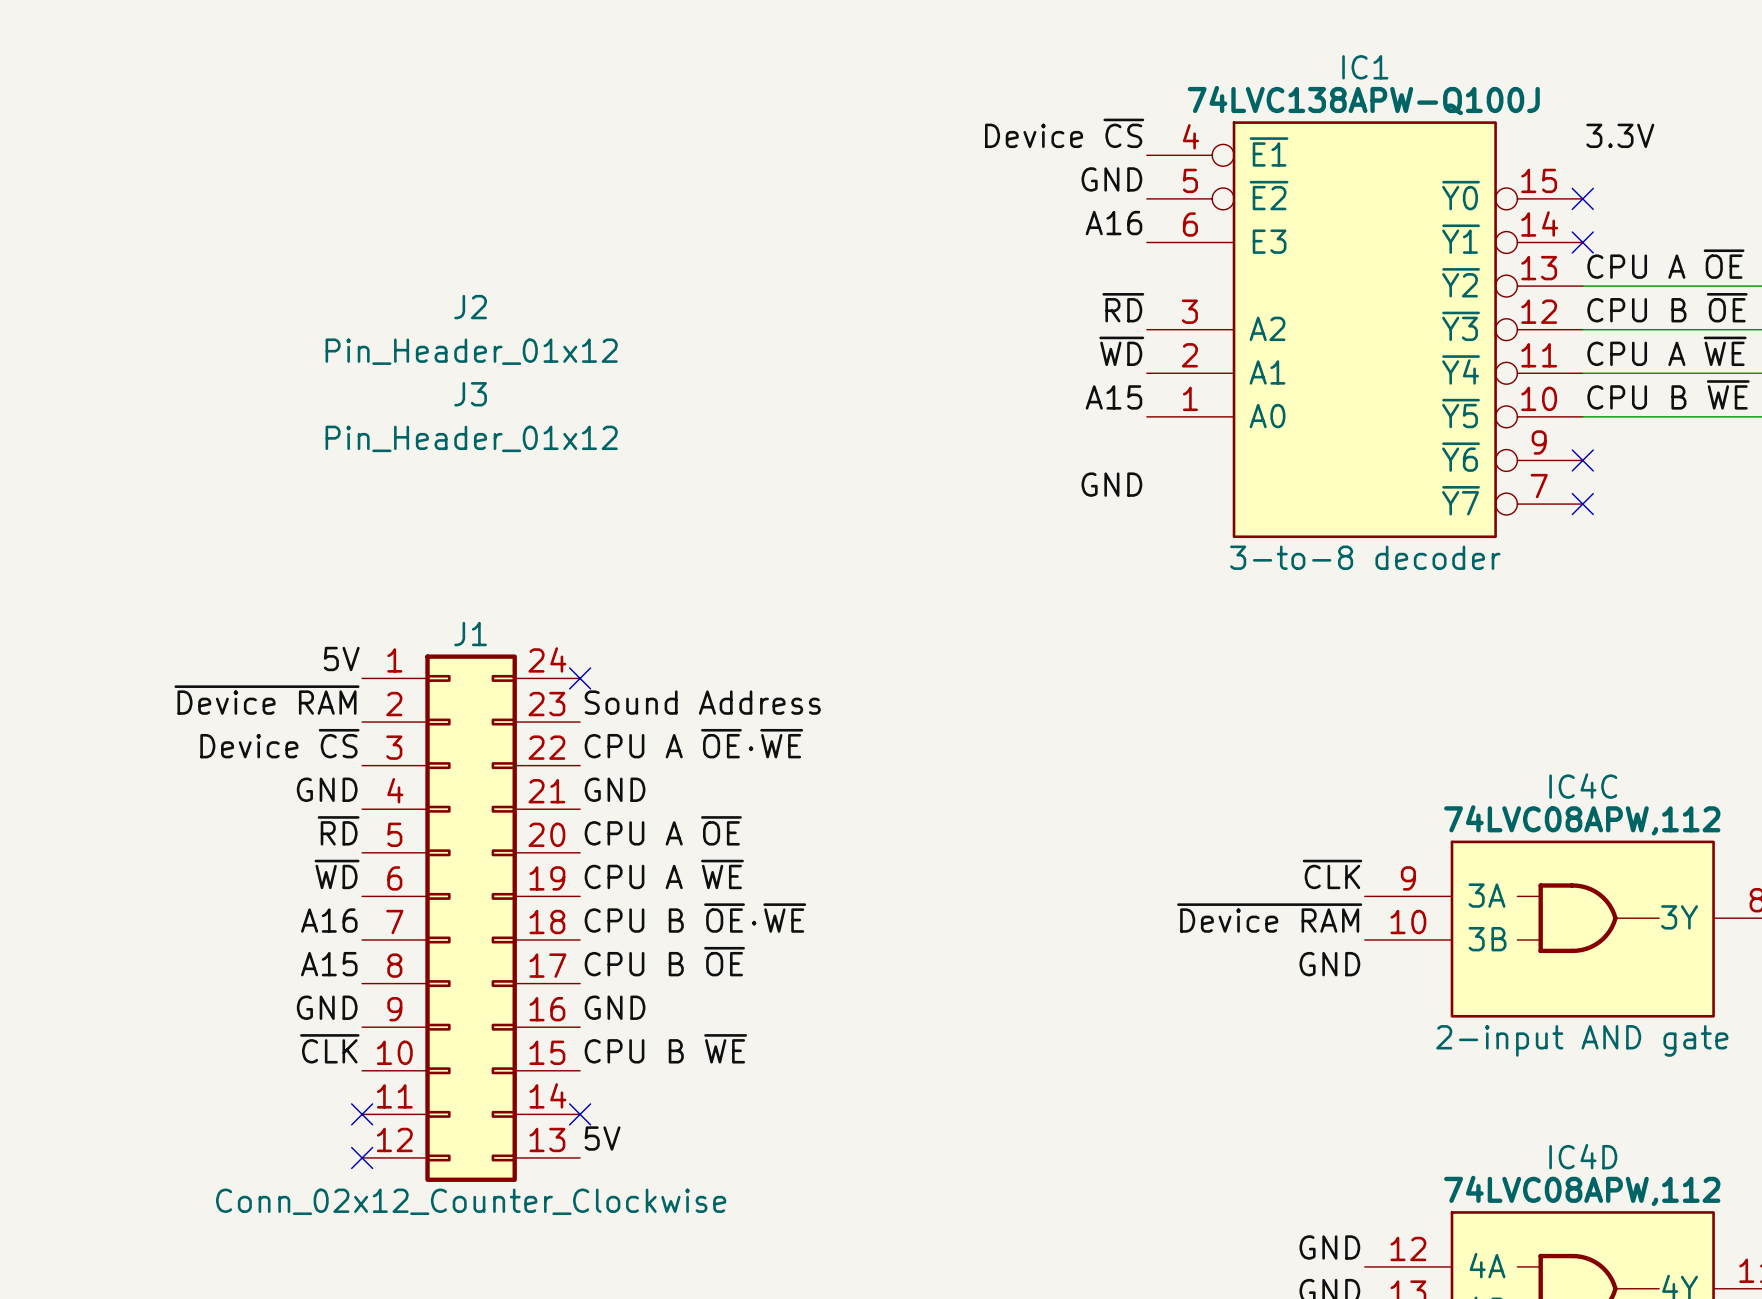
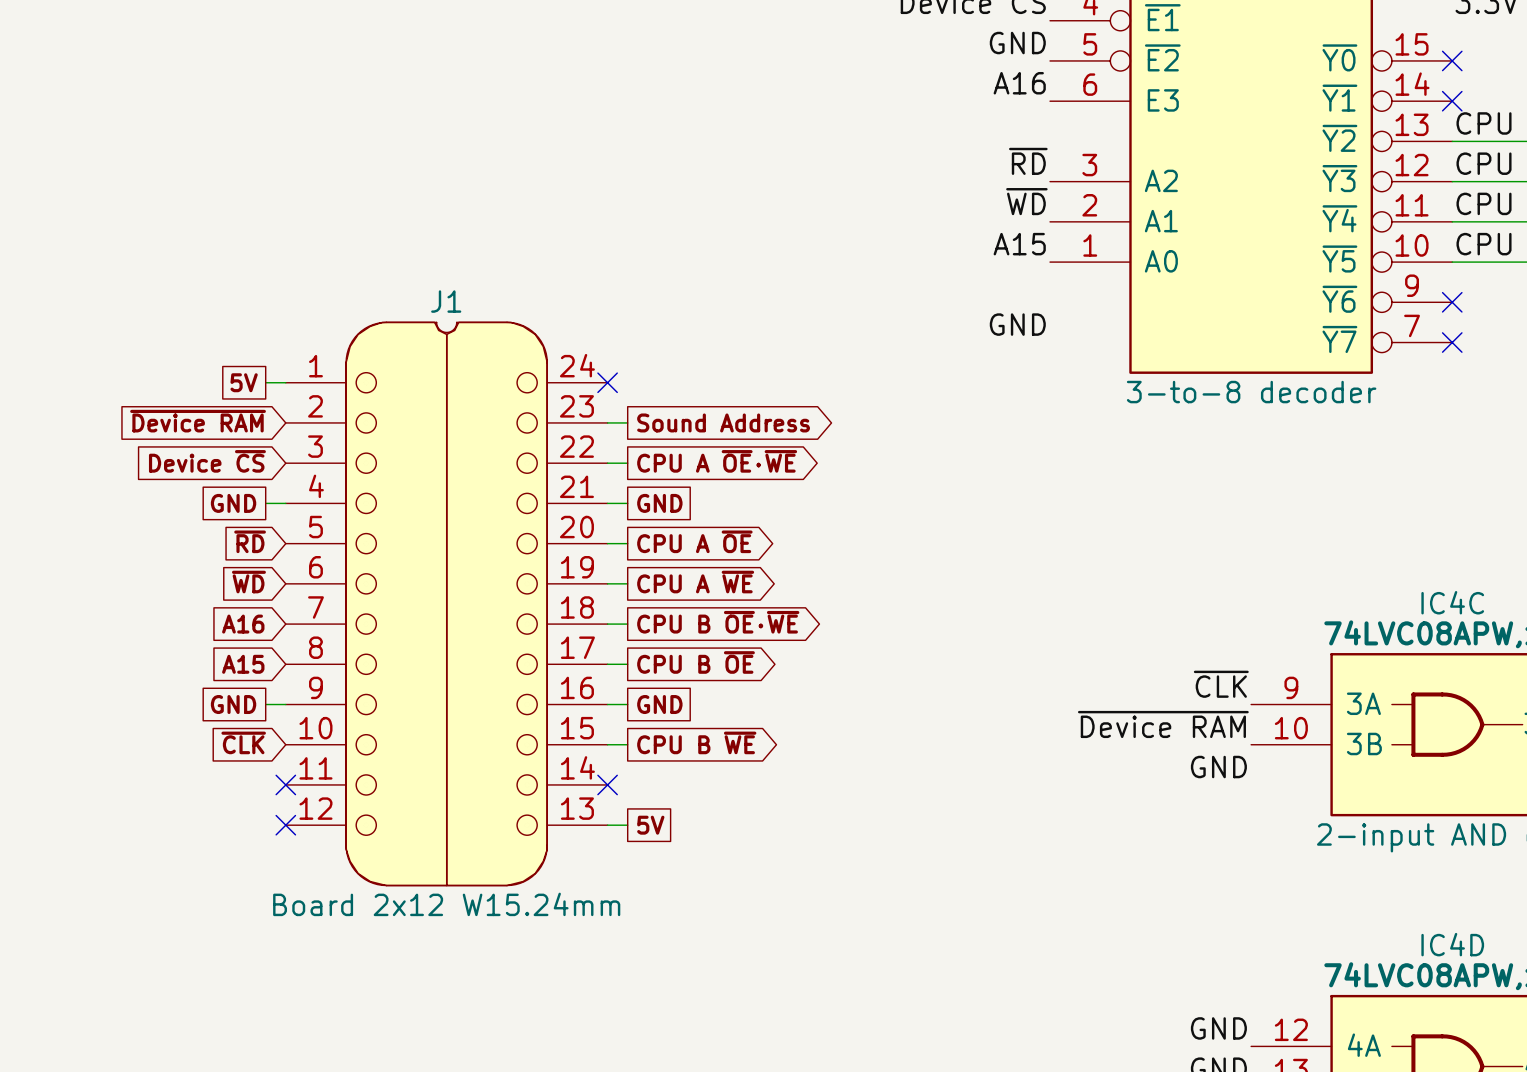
J2: Pin_Header_01x12 (471, 329) -> none
J3: Pin_Header_01x12 (471, 417) -> none
global label: none -> 5V (244, 382)
wire: none -> (265, 382) (285, 382)
no-connect mark: none -> (607, 382)
global label: none -> ~{Device RAM} (198, 421)
wire: none -> (607, 422) (627, 422)
global label: none -> Sound Address (723, 422)
global label: none -> Device ~{CS} (207, 461)
global label: none -> CPU A ~{OE}·~{WE} (717, 461)
J1 name position: J1 (470, 634) -> J1 (446, 301)
wire: none -> (607, 463) (627, 463)
J1 symbol: [362, 654, 581, 1182] -> [285, 322, 608, 886]
label: 5V (341, 658) -> none
global label: none -> GND (233, 503)
wire: none -> (265, 503) (285, 503)
no-connect mark: (580, 678) -> none
wire: none -> (607, 503) (627, 503)
global label: none -> GND (659, 503)
label: ~{Device RAM} (267, 700) -> none
label: Sound Address (702, 702) -> none
global label: none -> ~{RD} (250, 541)
global label: none -> CPU A ~{OE} (694, 541)
wire: none -> (607, 543) (627, 543)
label: Device ~{CS} (279, 743) -> none
label: CPU A ~{OE}·~{WE} (693, 743) -> none
global label: none -> ~{WD} (248, 582)
global label: none -> CPU A ~{WE} (695, 582)
wire: none -> (607, 583) (627, 583)
label: GND (327, 789) -> none
label: GND (615, 789) -> none
global label: none -> CPU B ~{OE}·~{WE} (718, 622)
global label: none -> A16 (243, 624)
wire: none -> (607, 624) (627, 624)
label: ~{RD} (338, 830) -> none
label: CPU A ~{OE} (663, 830) -> none
global label: none -> CPU B ~{OE} (696, 662)
global label: none -> A15 (243, 664)
wire: none -> (607, 664) (627, 664)
label: ~{WD} (337, 874) -> none
label: CPU A ~{WE} (664, 874) -> none
global label: none -> GND (233, 704)
wire: none -> (265, 704) (285, 704)
wire: none -> (607, 704) (627, 704)
global label: none -> GND (659, 704)
label: CPU B ~{OE}·~{WE} (695, 918) -> none
label: A16 (329, 920) -> none
global label: none -> ~{CLK} (243, 742)
global label: none -> CPU B ~{WE} (696, 742)
wire: none -> (607, 744) (627, 744)
label: CPU B ~{OE} (664, 961) -> none
label: A15 (329, 964) -> none
no-connect mark: none -> (285, 784)
no-connect mark: none -> (607, 784)
label: GND (327, 1007) -> none
label: GND (615, 1007) -> none
no-connect mark: none -> (285, 825)
wire: none -> (607, 825) (627, 825)
global label: none -> 5V (650, 825)
label: ~{CLK} (329, 1048) -> none
label: CPU B ~{WE} (665, 1048) -> none
no-connect mark: (362, 1114) -> none
no-connect mark: (580, 1114) -> none
label: 5V (602, 1138) -> none
no-connect mark: (362, 1157) -> none
J1 value: Conn_02x12_Counter_Clockwise (471, 1201) -> Board 2x12 W15.24mm (446, 904)

